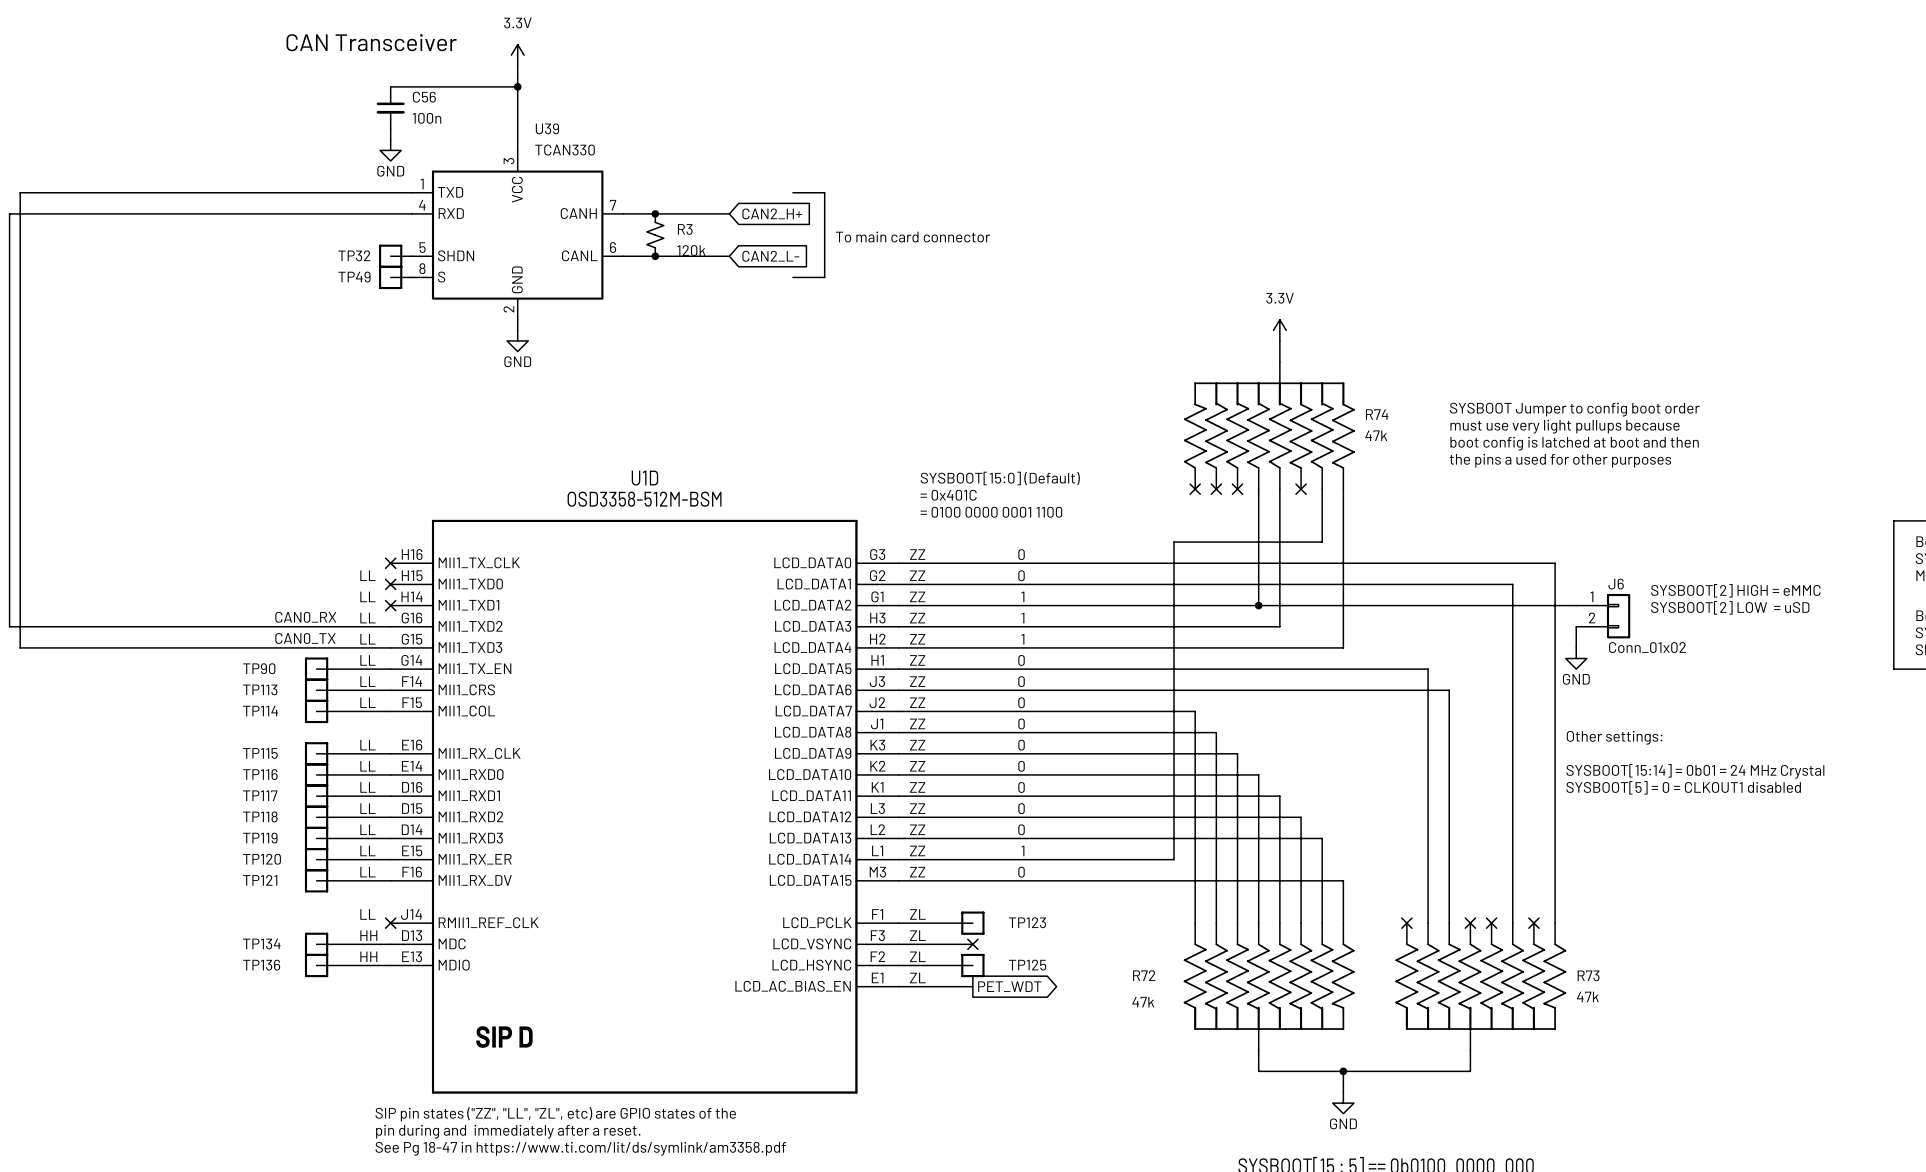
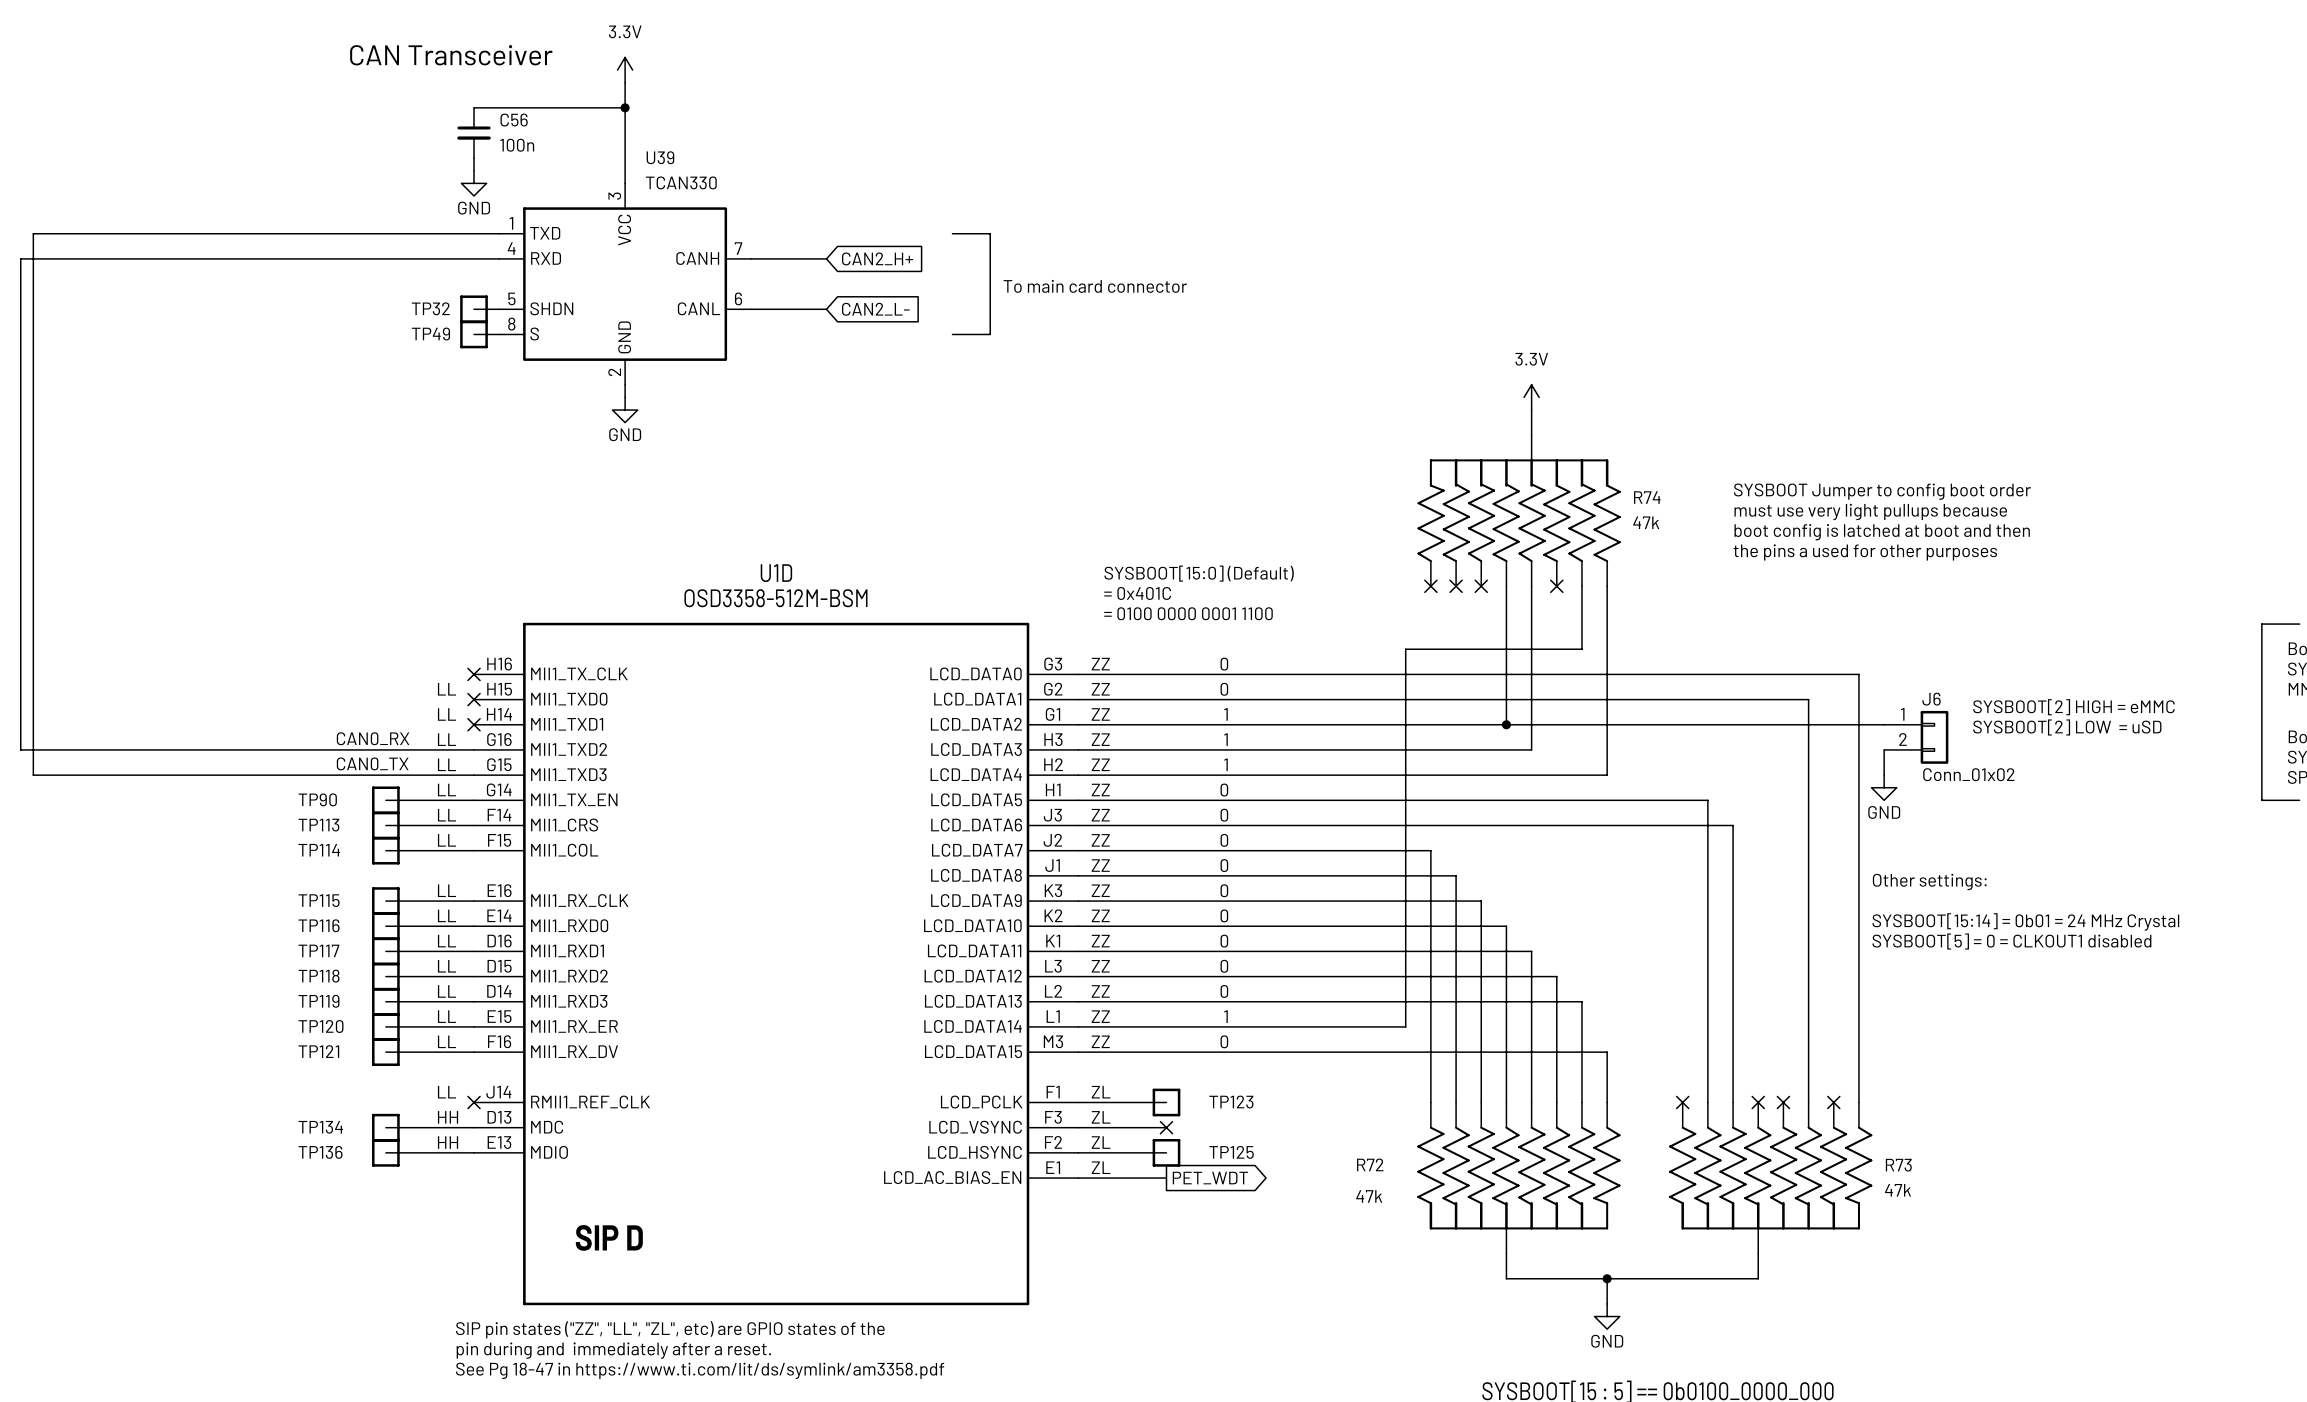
junction: (655, 213) -> none
wire: (687, 213) (729, 213) -> none
global label position: CAN2_H+ (772, 213) -> CAN2_H+ (877, 258)
R3: 120k (655, 235) -> none
junction: (655, 256) -> none
wire: (687, 256) (729, 256) -> none
global label position: CAN2_L- (770, 256) -> CAN2_L- (875, 309)

